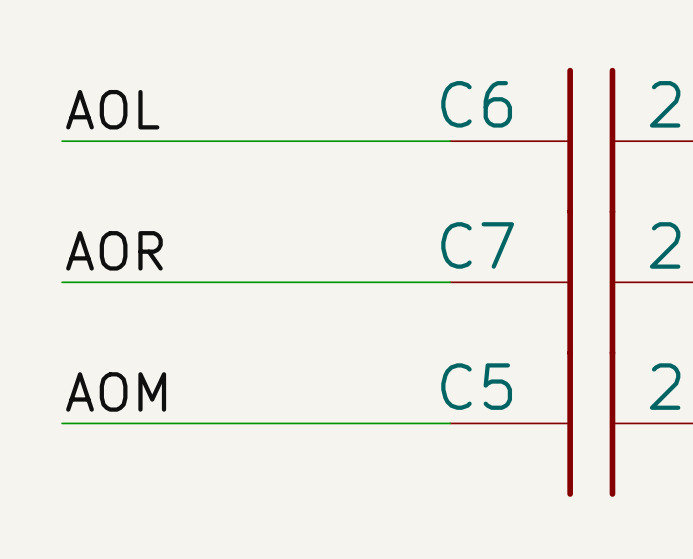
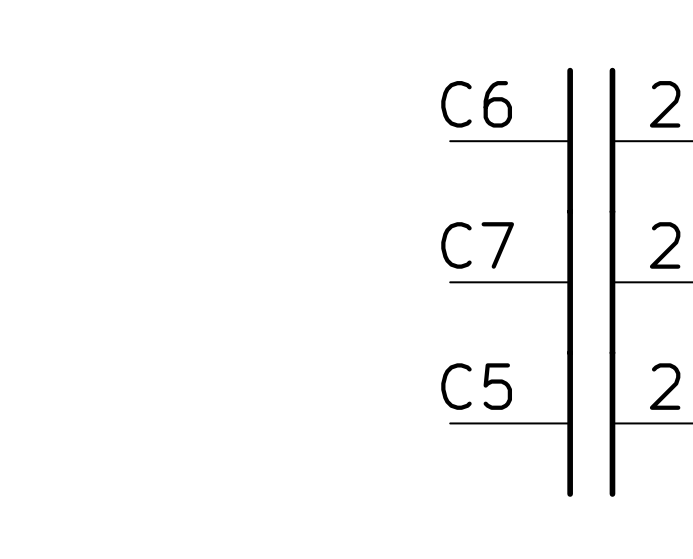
label: AOL (112, 109) -> none
wire: (62, 141) (450, 141) -> none
label: AOR (114, 250) -> none
wire: (62, 282) (450, 282) -> none
label: AOM (116, 391) -> none
wire: (62, 423) (450, 423) -> none

